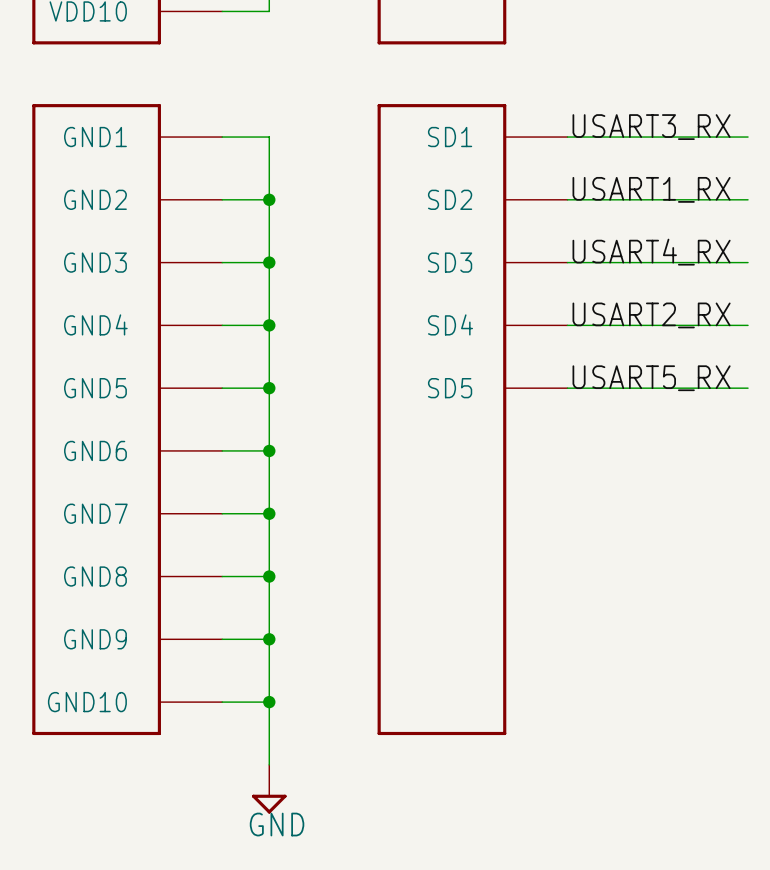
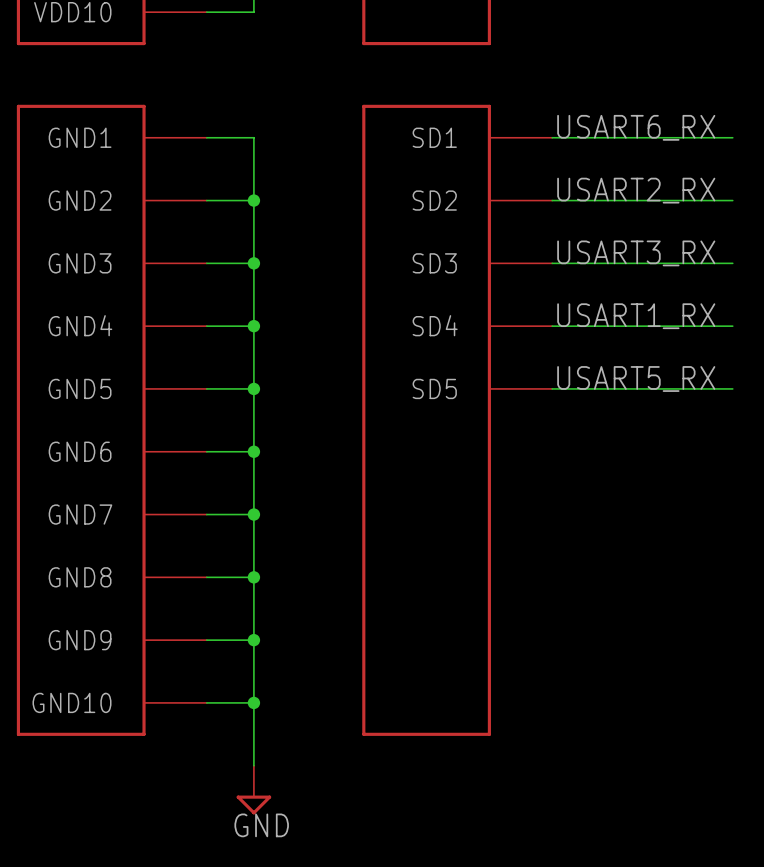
label: USART3_RX (651, 127) -> USART6_RX (636, 127)
label: USART1_RX (651, 189) -> USART2_RX (636, 190)
label: USART4_RX (651, 252) -> USART3_RX (636, 253)
label: USART2_RX (651, 315) -> USART1_RX (636, 316)

